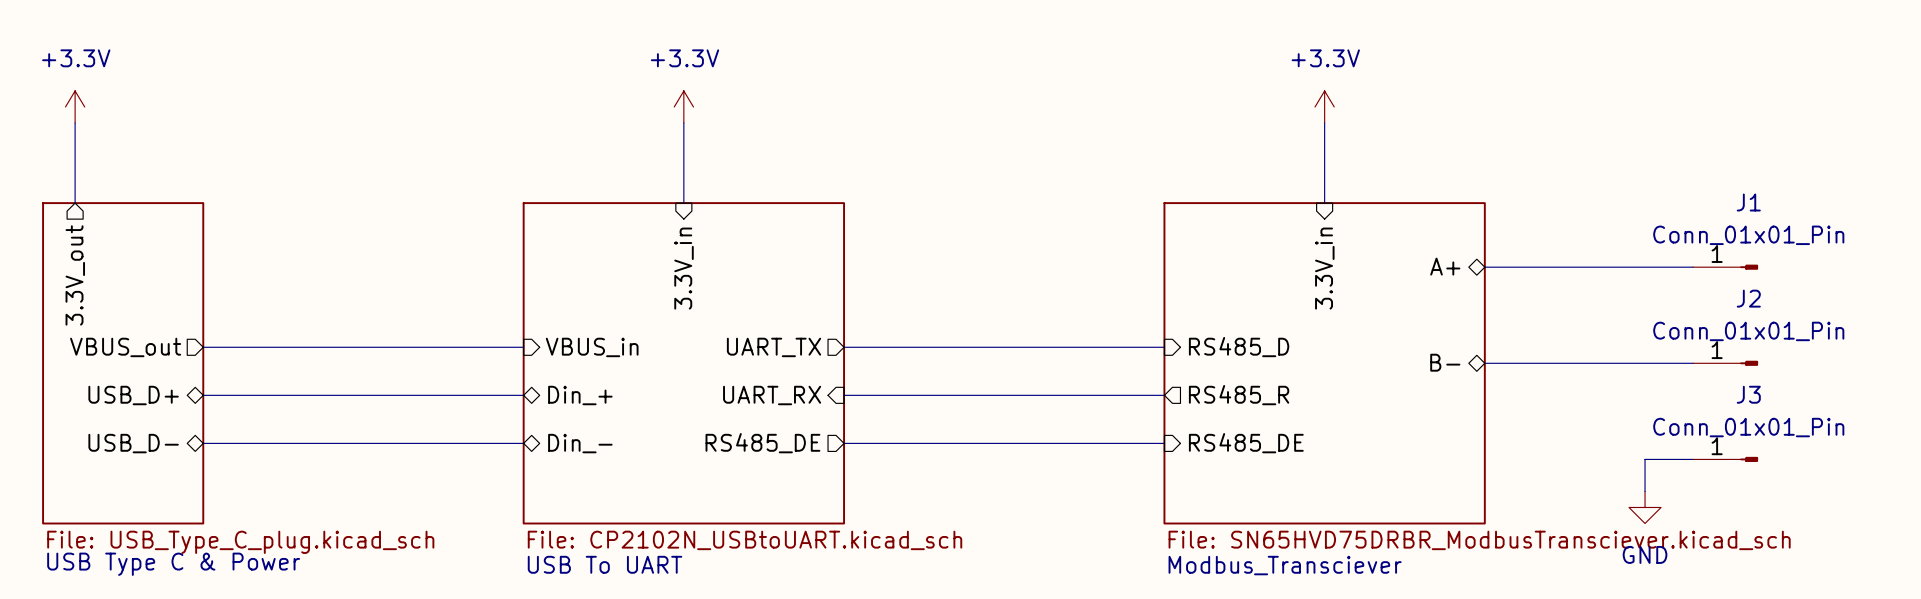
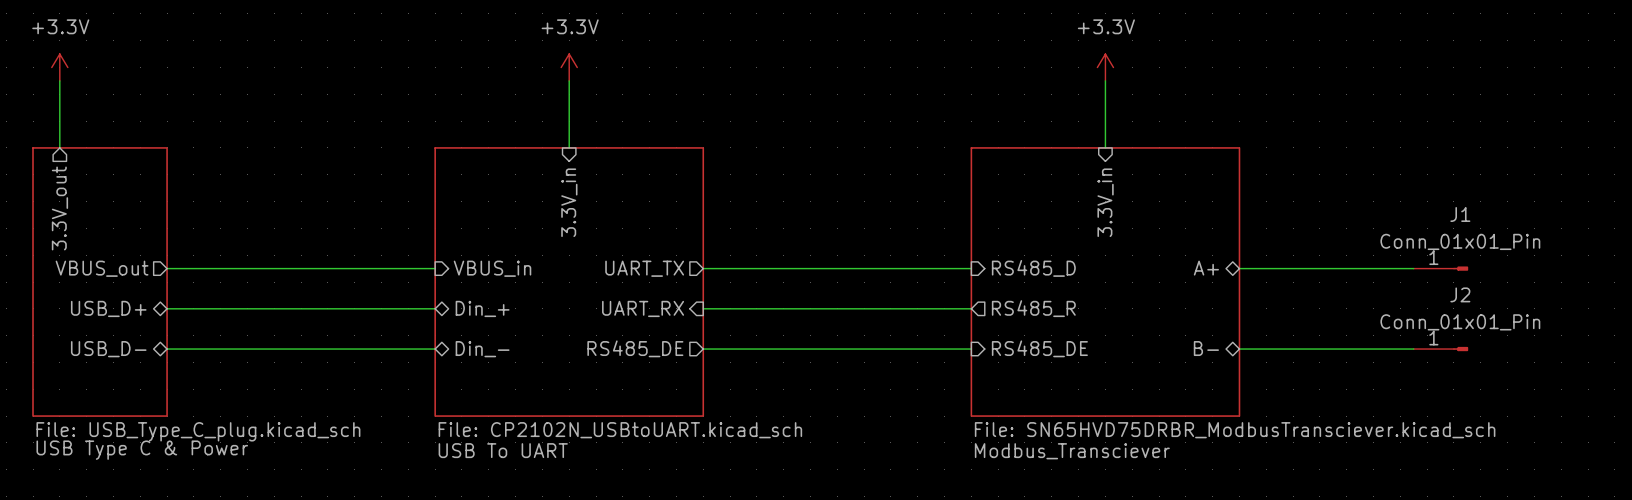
sheet pin position: A+ (1445, 266) -> A+ (1206, 268)
wire: (1484, 267) (1693, 267) -> (1239, 268) (1413, 268)
J1 position: (1725, 267) -> (1440, 268)
sheet pin position: B- (1445, 362) -> B- (1206, 348)
wire: (1484, 363) (1693, 363) -> (1239, 349) (1413, 349)
J2 position: (1725, 363) -> (1440, 349)
wire: (1693, 459) (1645, 459) (1645, 491) -> none
J3: Conn_01x01_Pin (1725, 459) -> none
power symbol: GND (1645, 507) -> none

